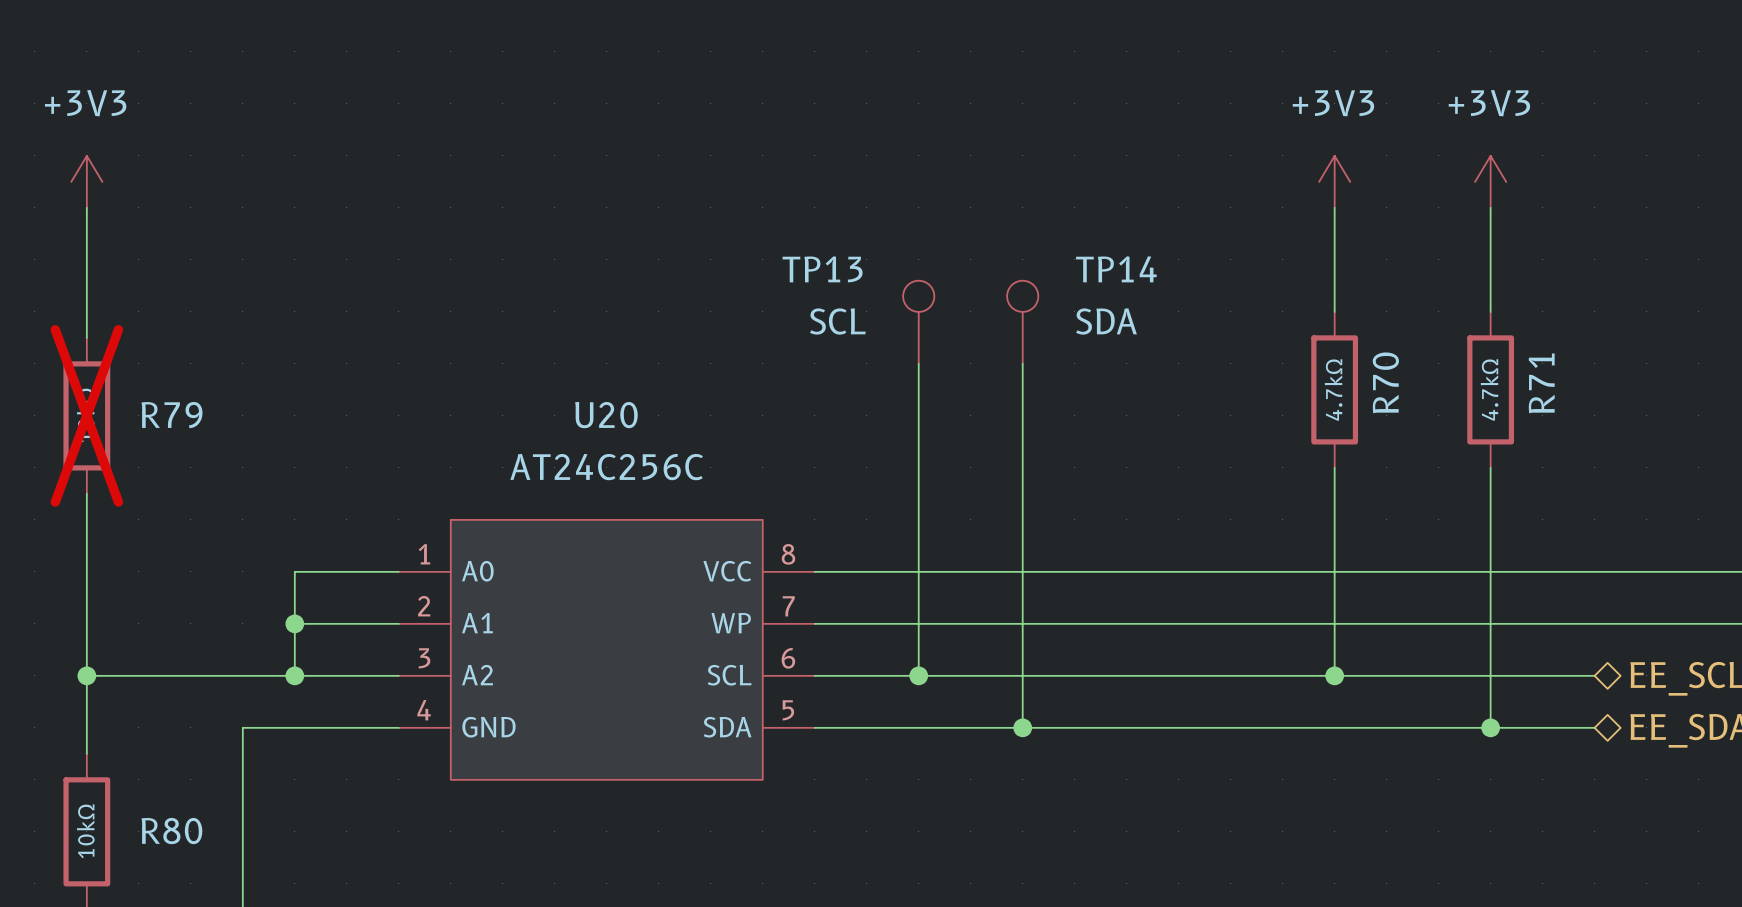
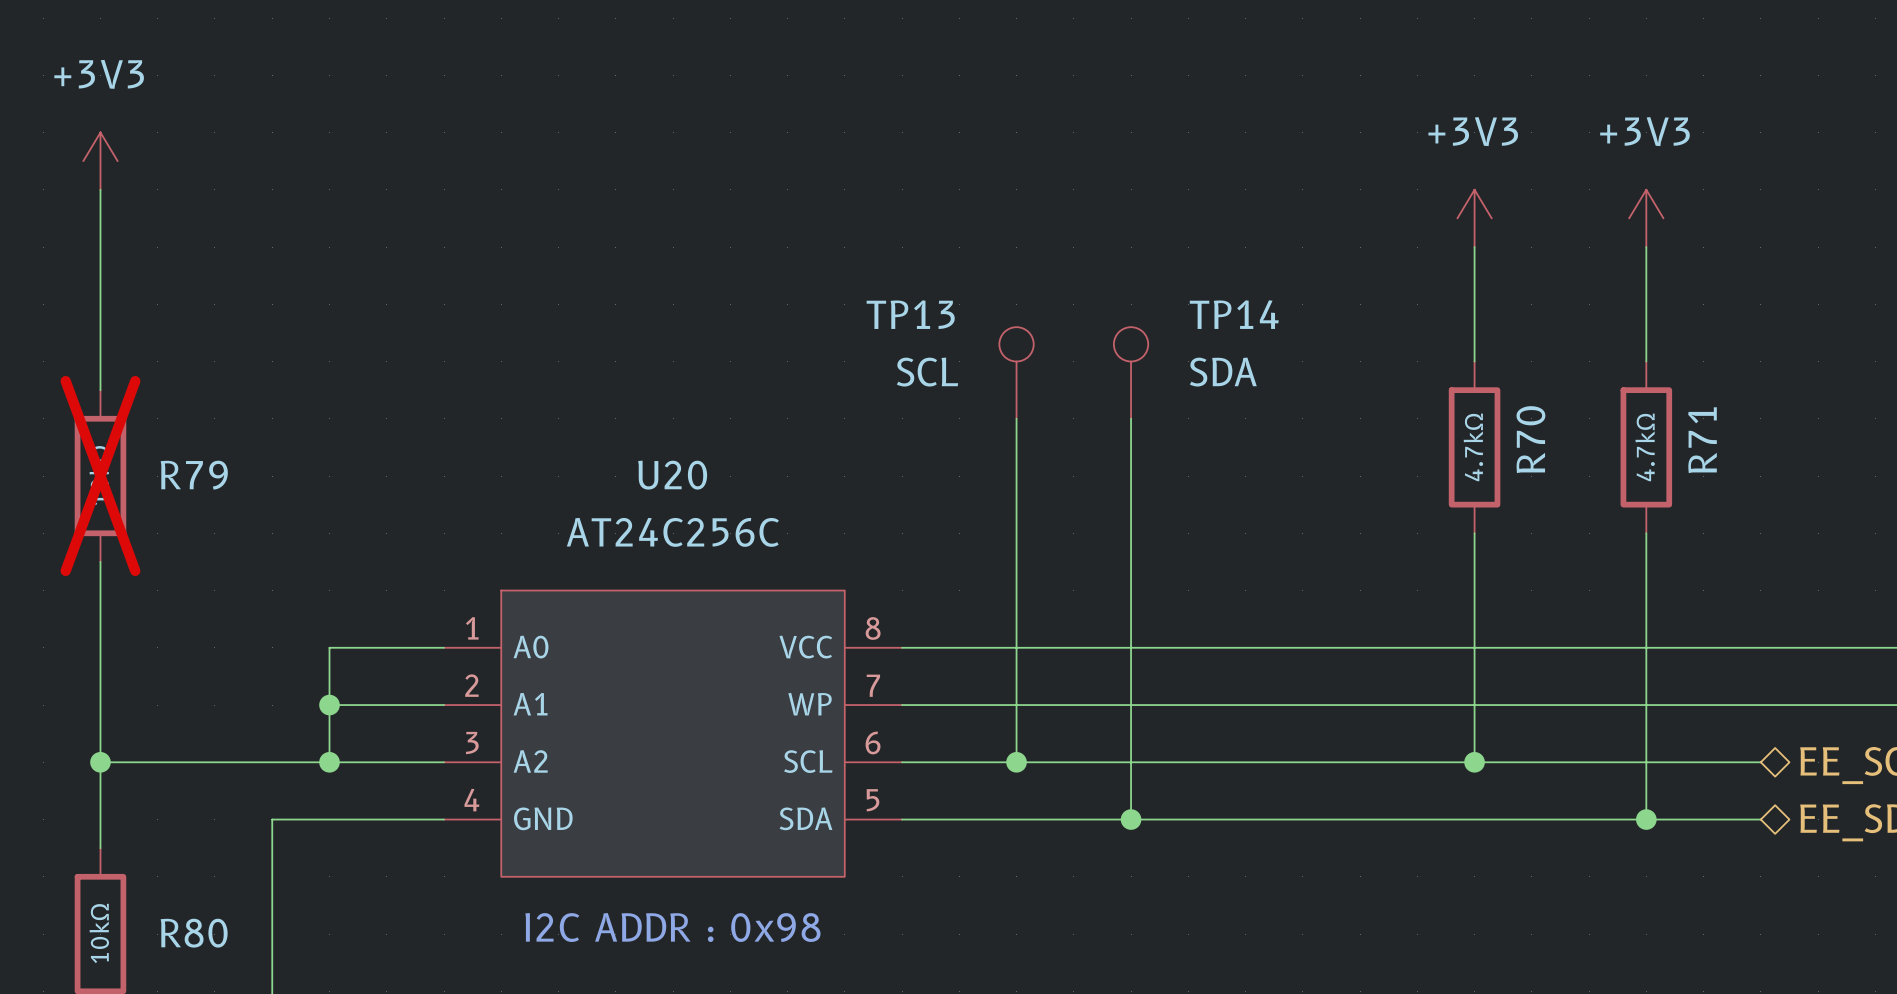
power symbol position: +3V3 (86, 181) -> +3V3 (100, 161)
text: none -> I2C ADDR : 0x98 (672, 927)

